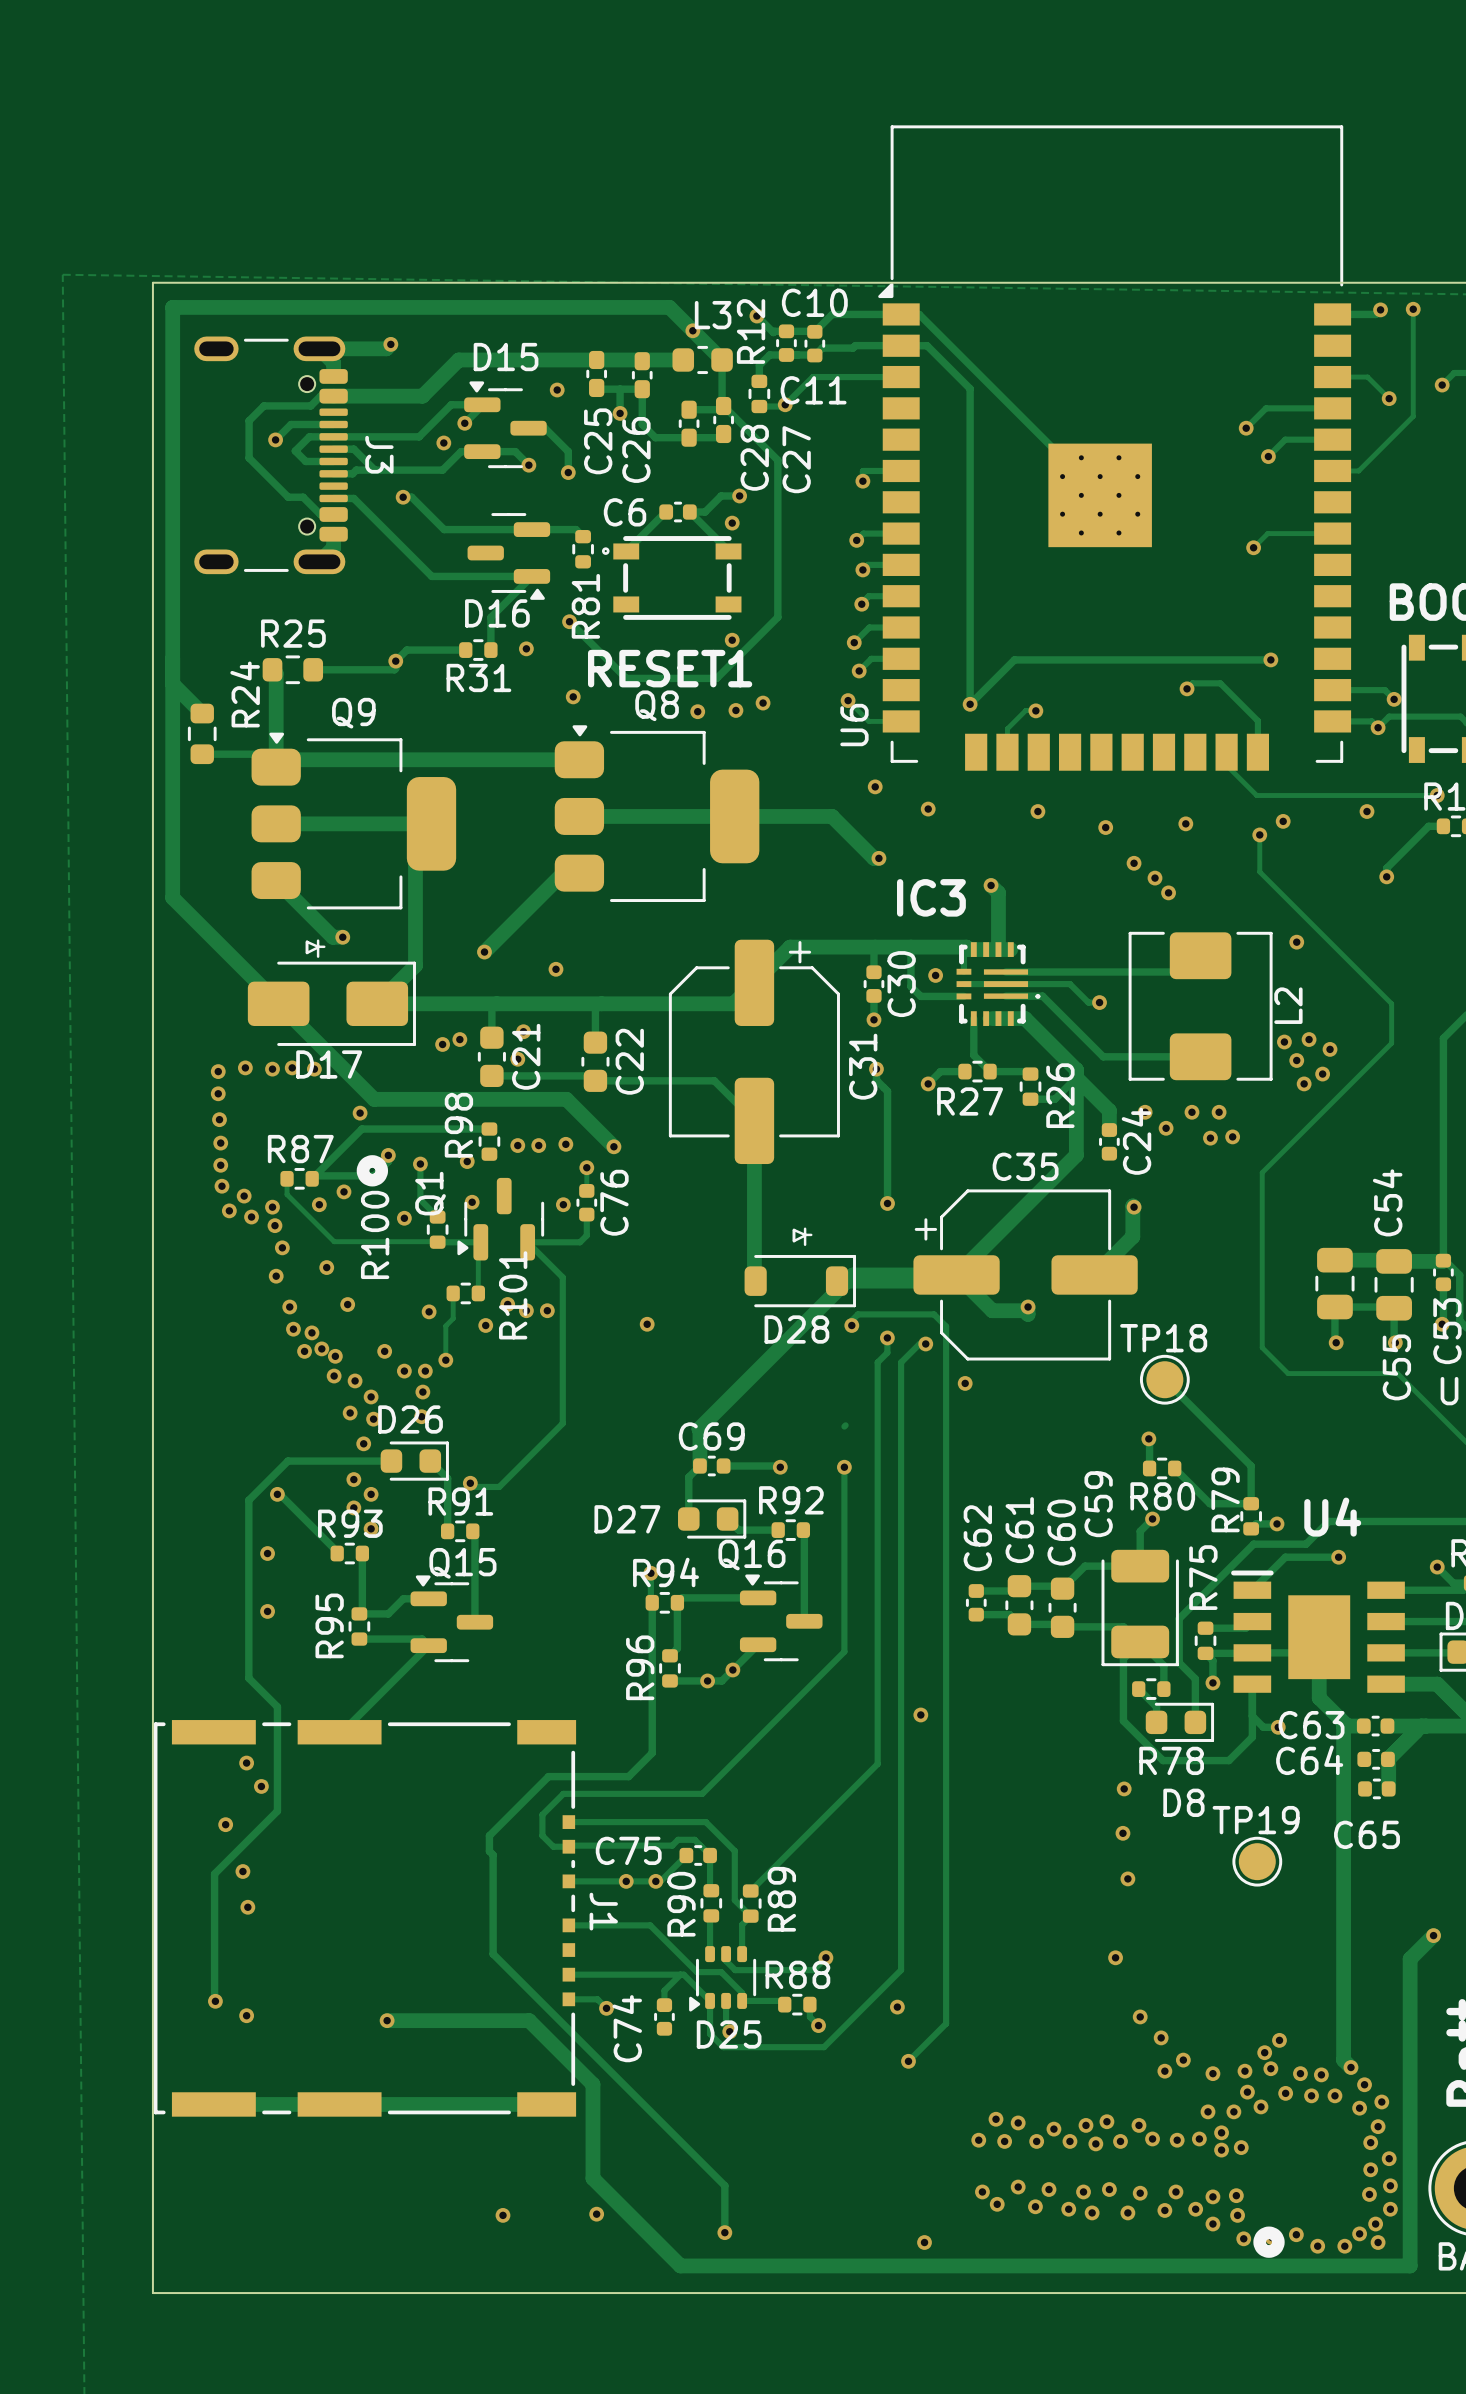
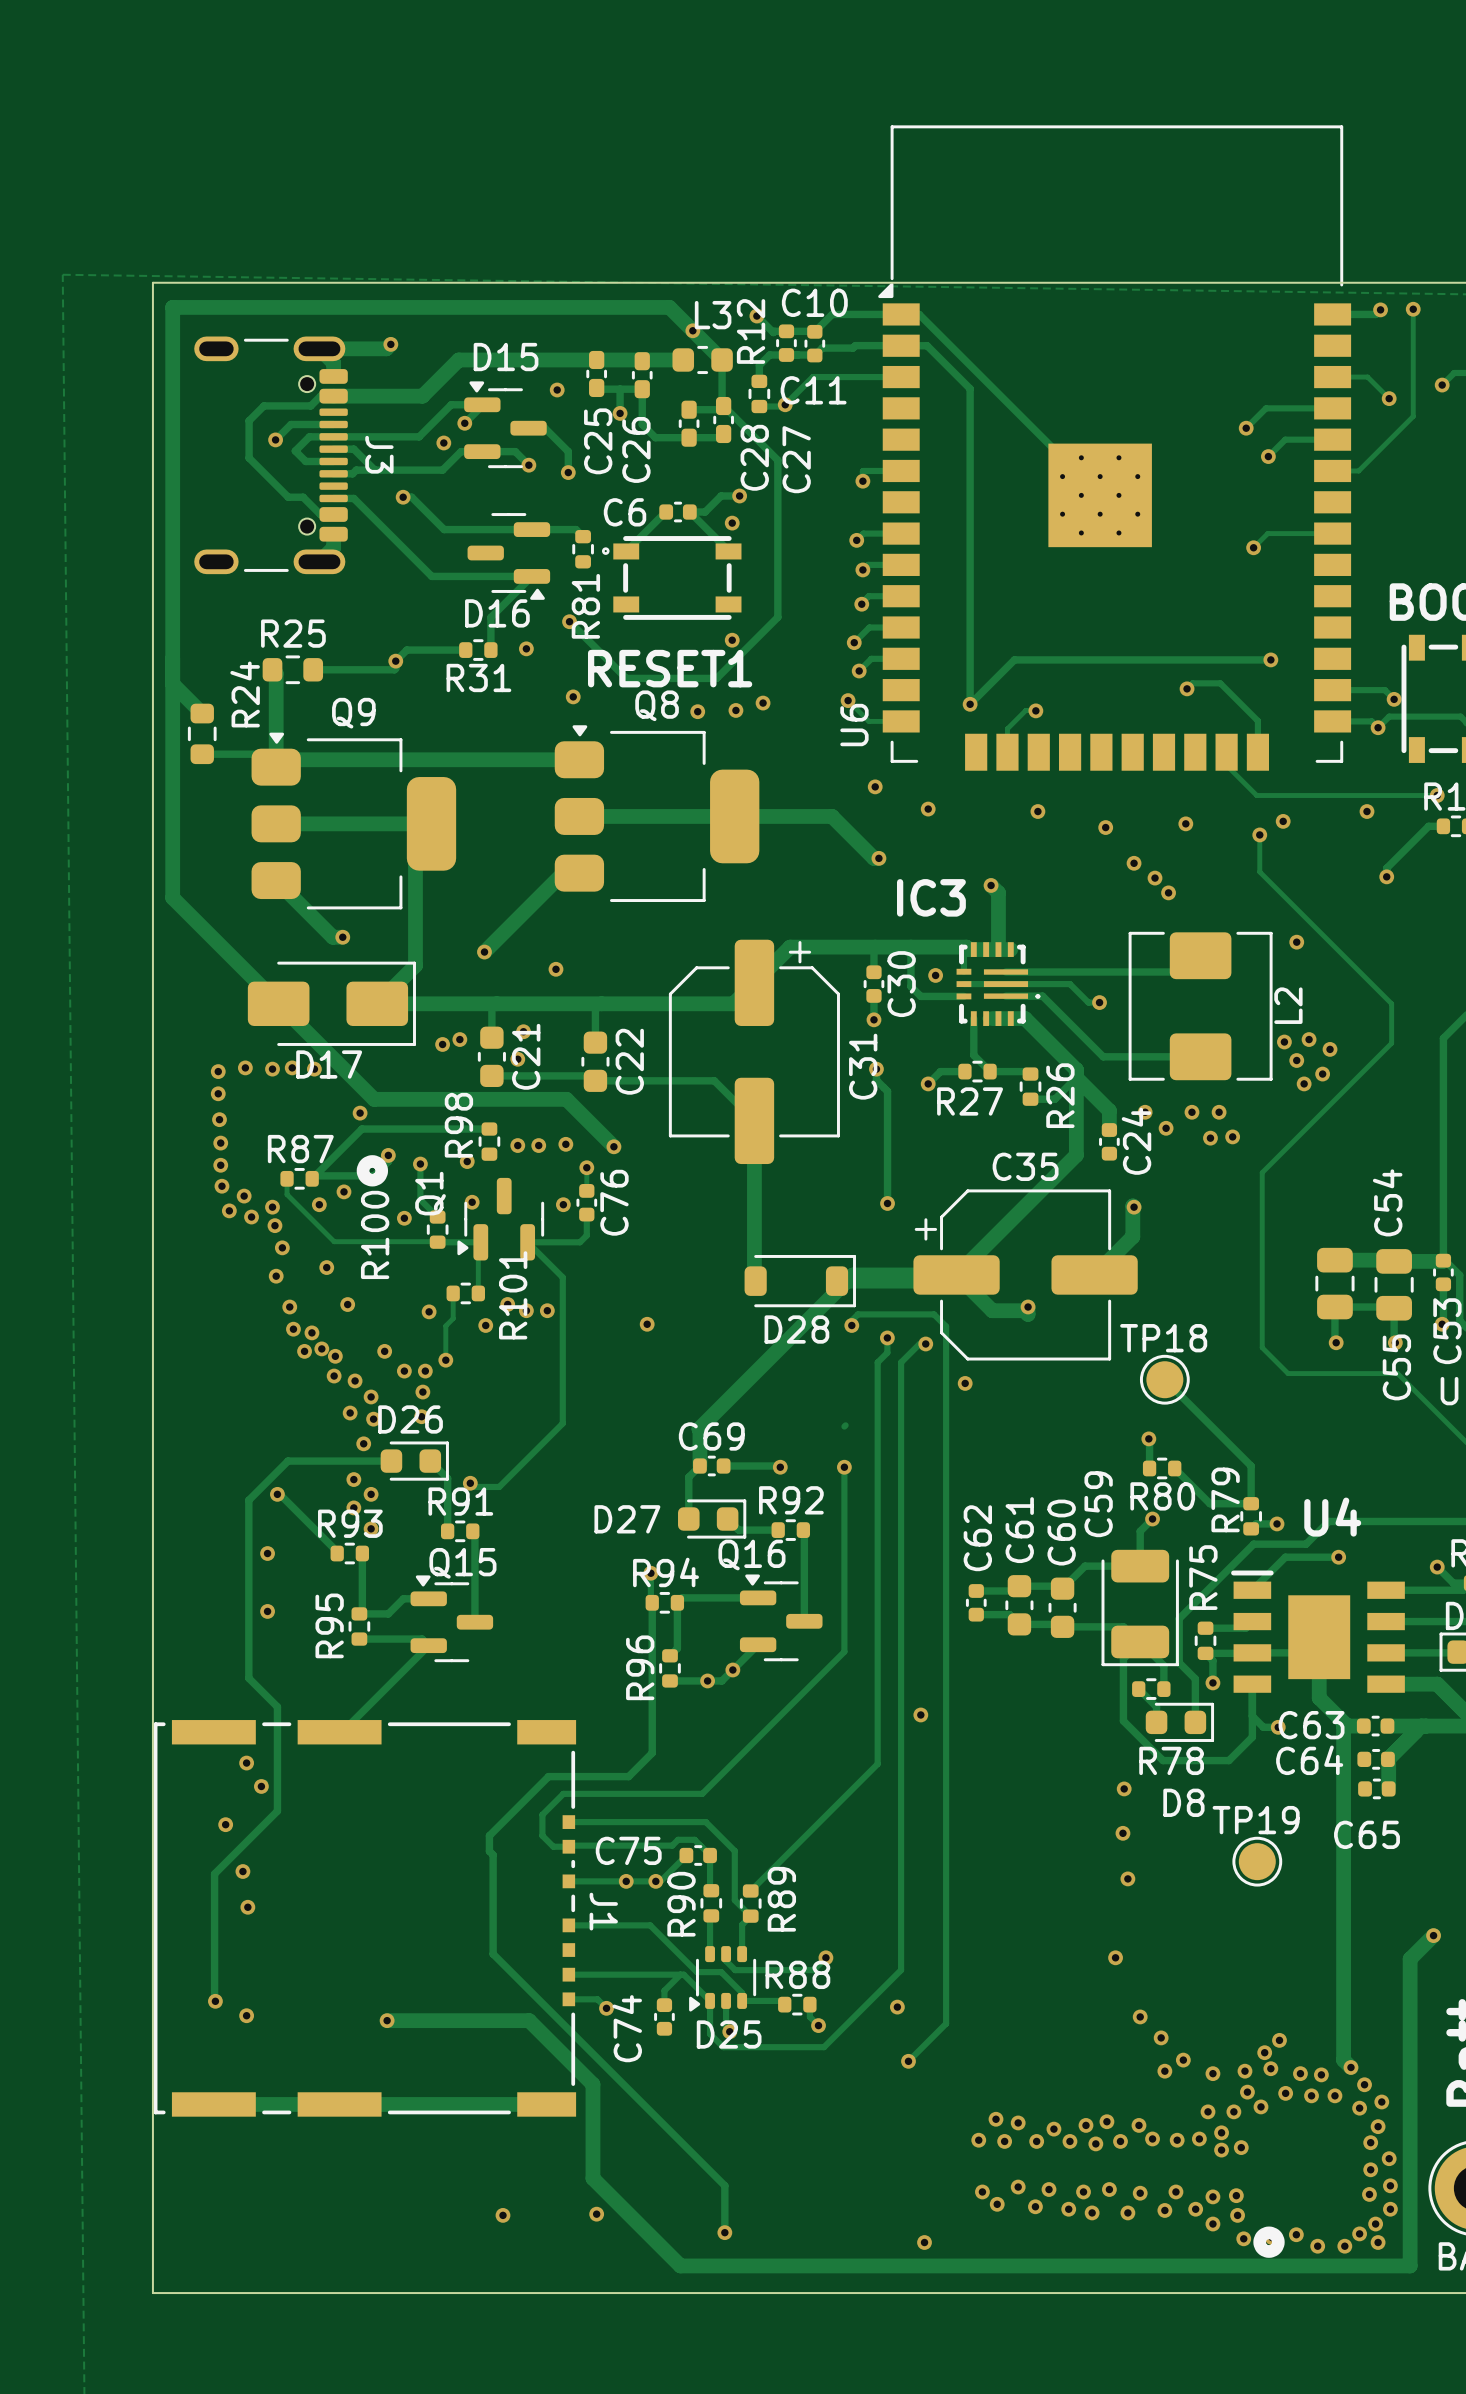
line: (318, 940) (318, 946) -> none
line: (318, 946) (324, 946) -> none
line: (318, 946) (307, 941) (307, 952) (318, 947) (318, 956) -> none
line: (805, 1228) (805, 1234) -> none
line: (805, 1234) (811, 1234) -> none
line: (805, 1234) (793, 1229) (793, 1241) (805, 1235) (805, 1244) -> none

